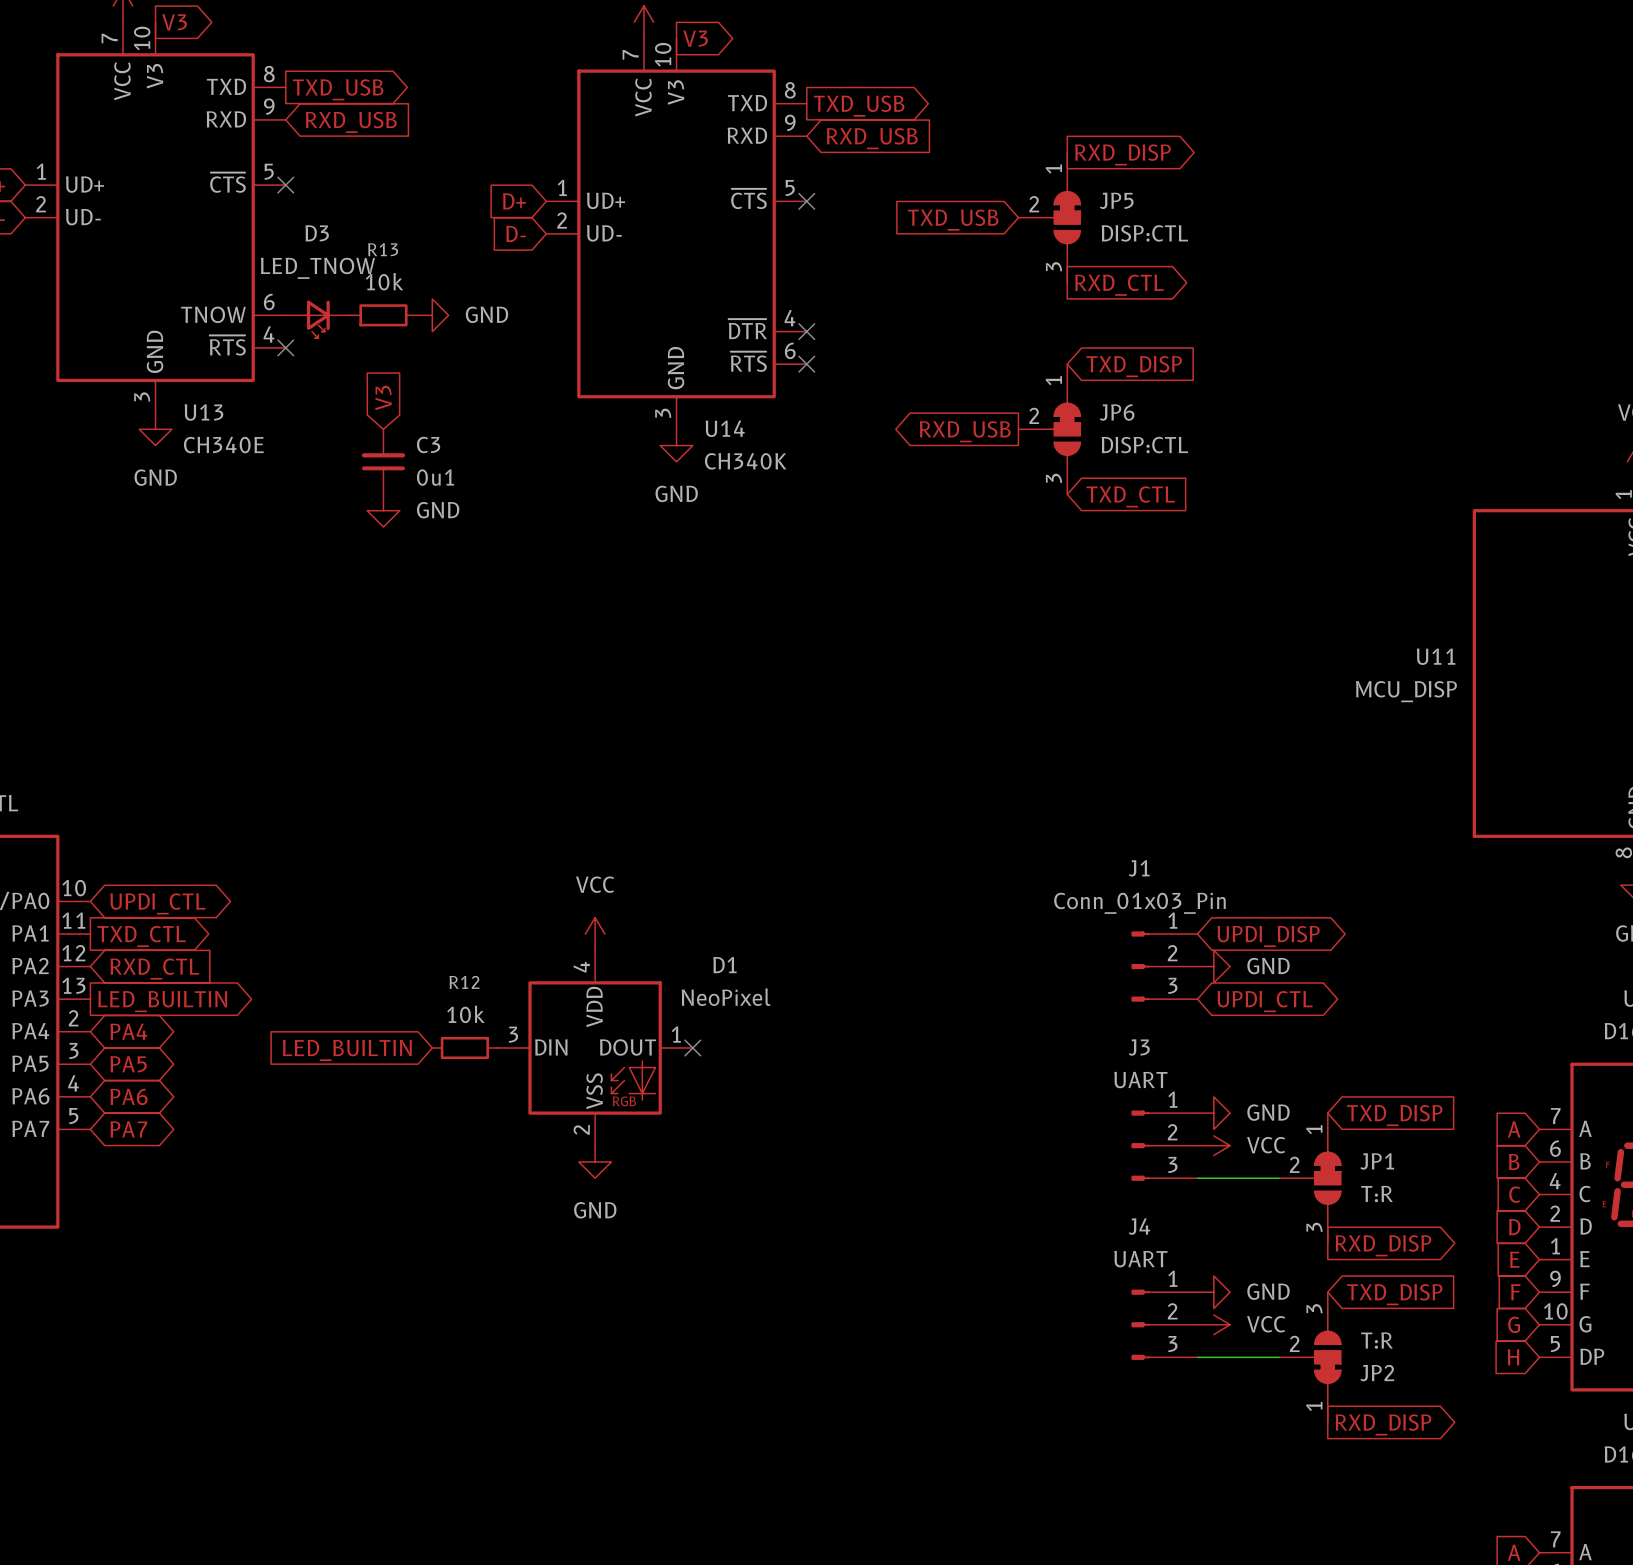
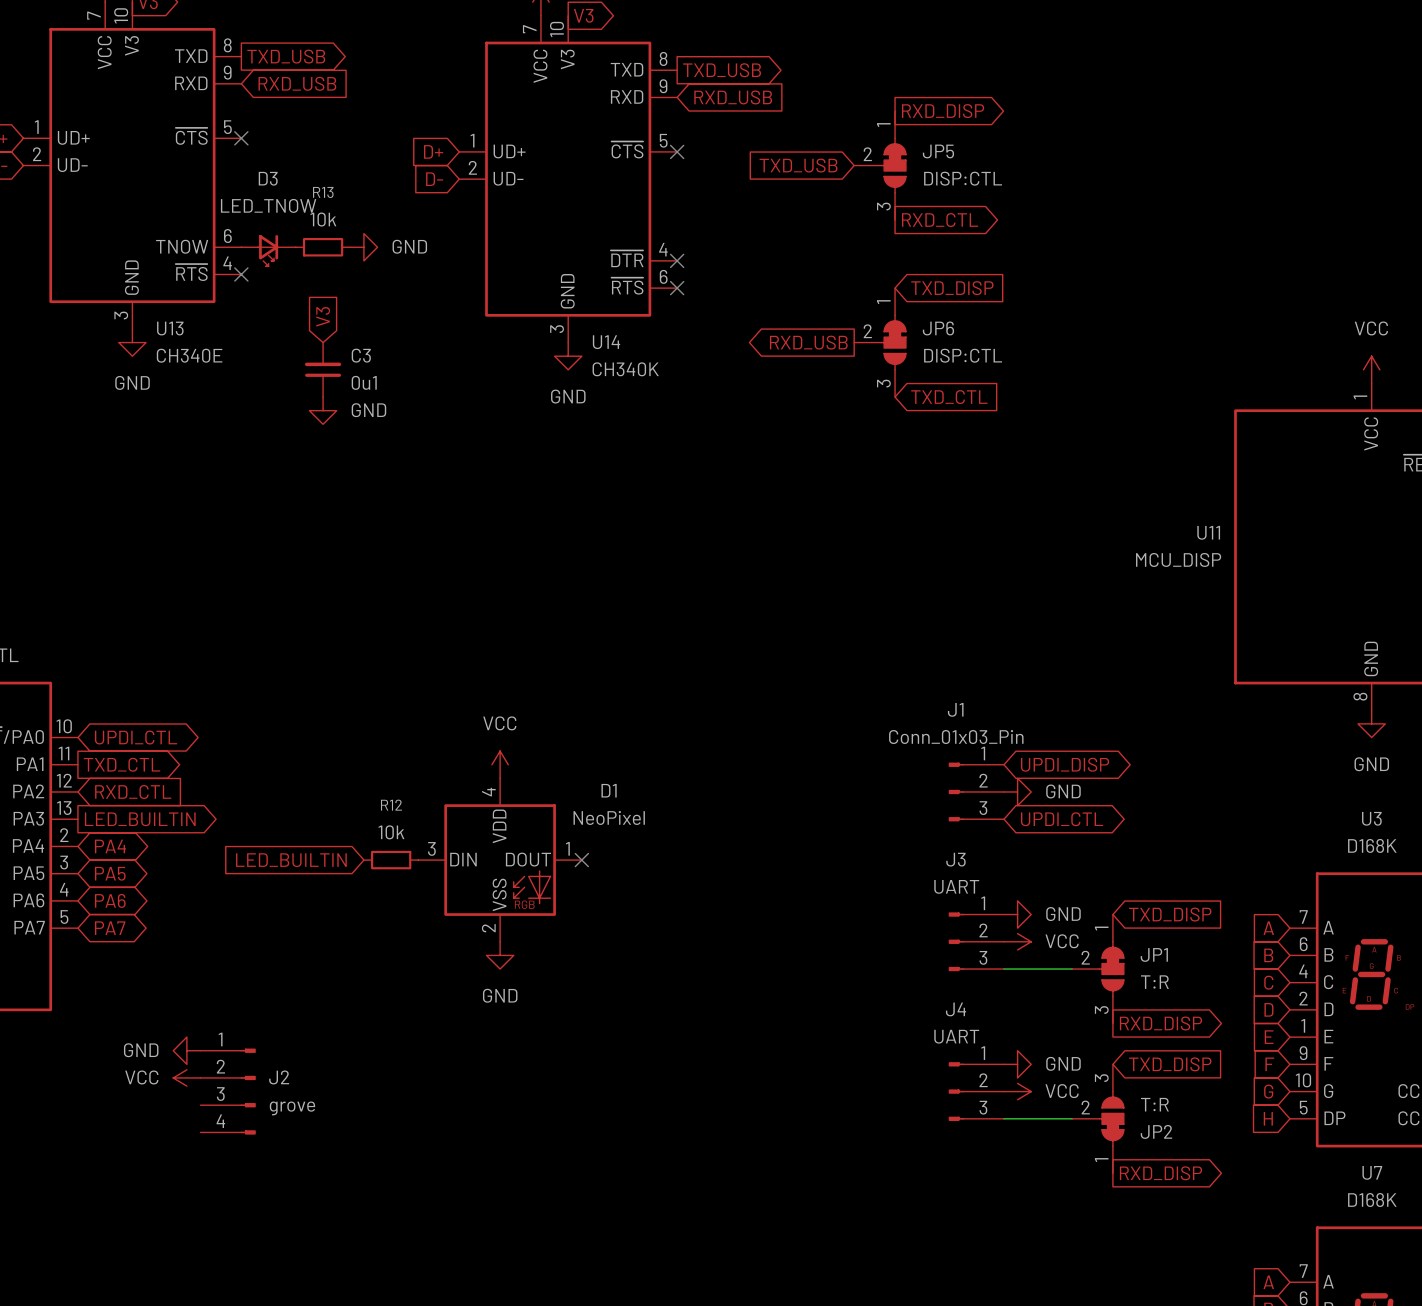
power symbol: none -> GND (186, 1050)
power symbol: none -> VCC (186, 1077)
J2: none -> grove (228, 1091)

